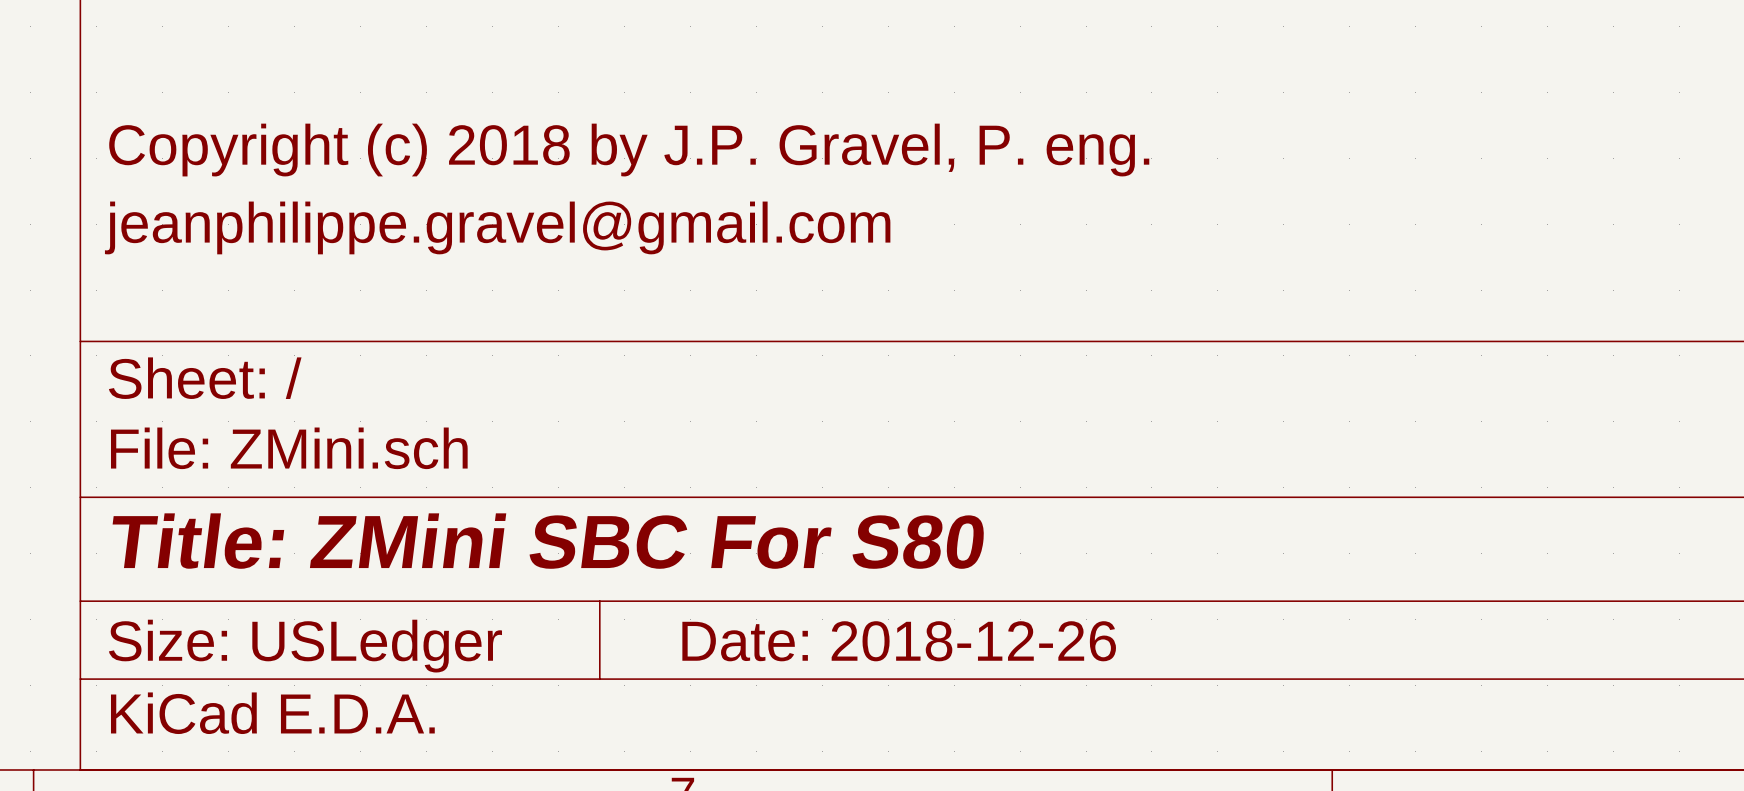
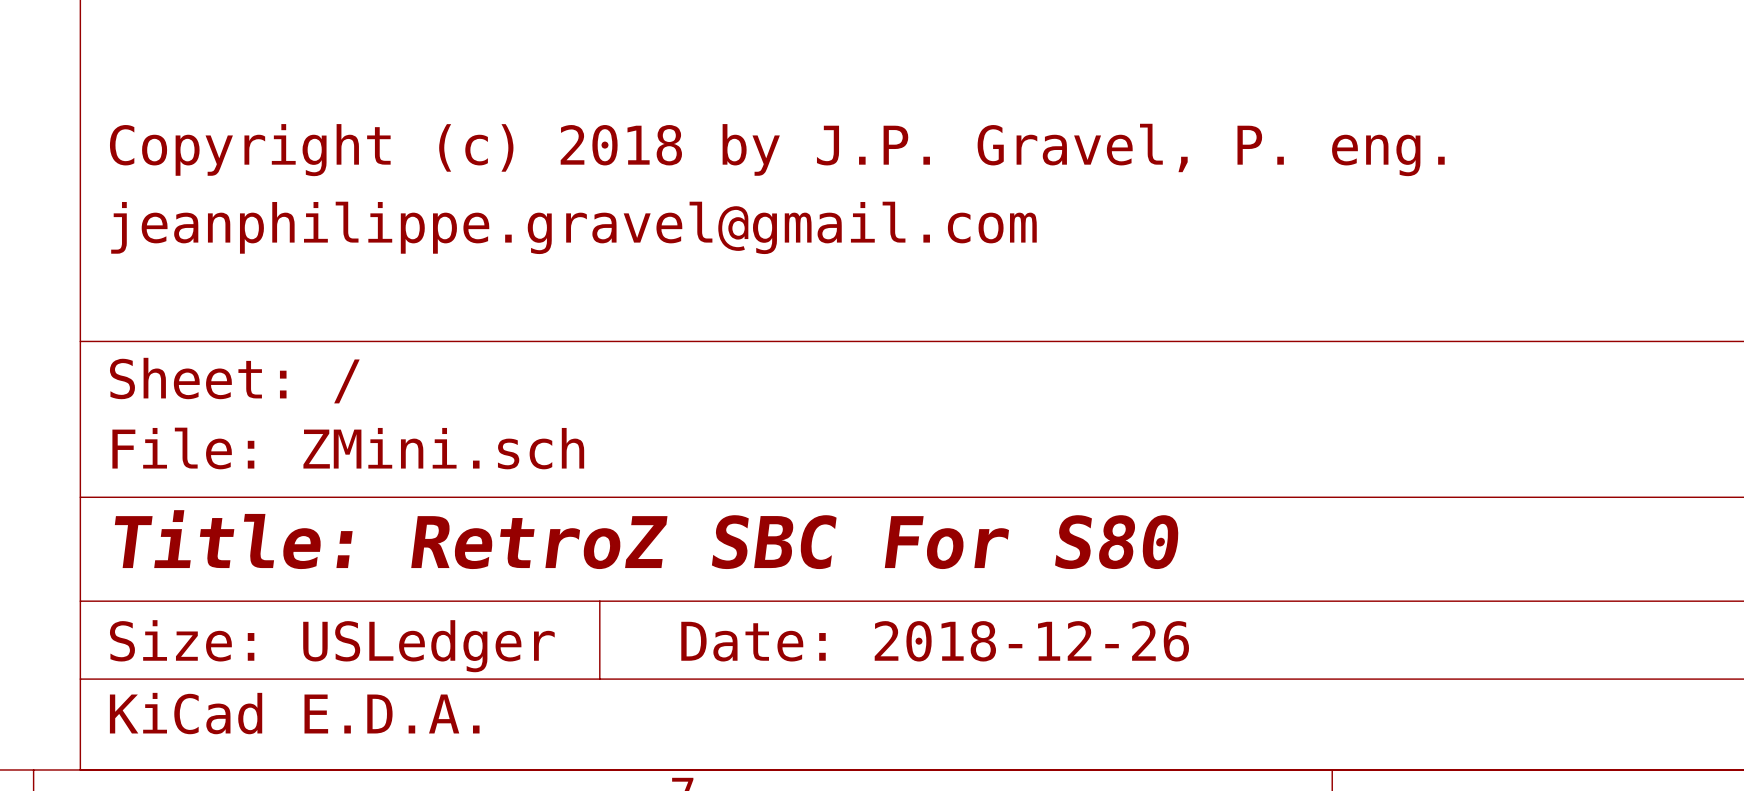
title block: Title: ZMini SBC For S80 (548, 541) -> Title: RetroZ SBC For S80 (647, 539)

